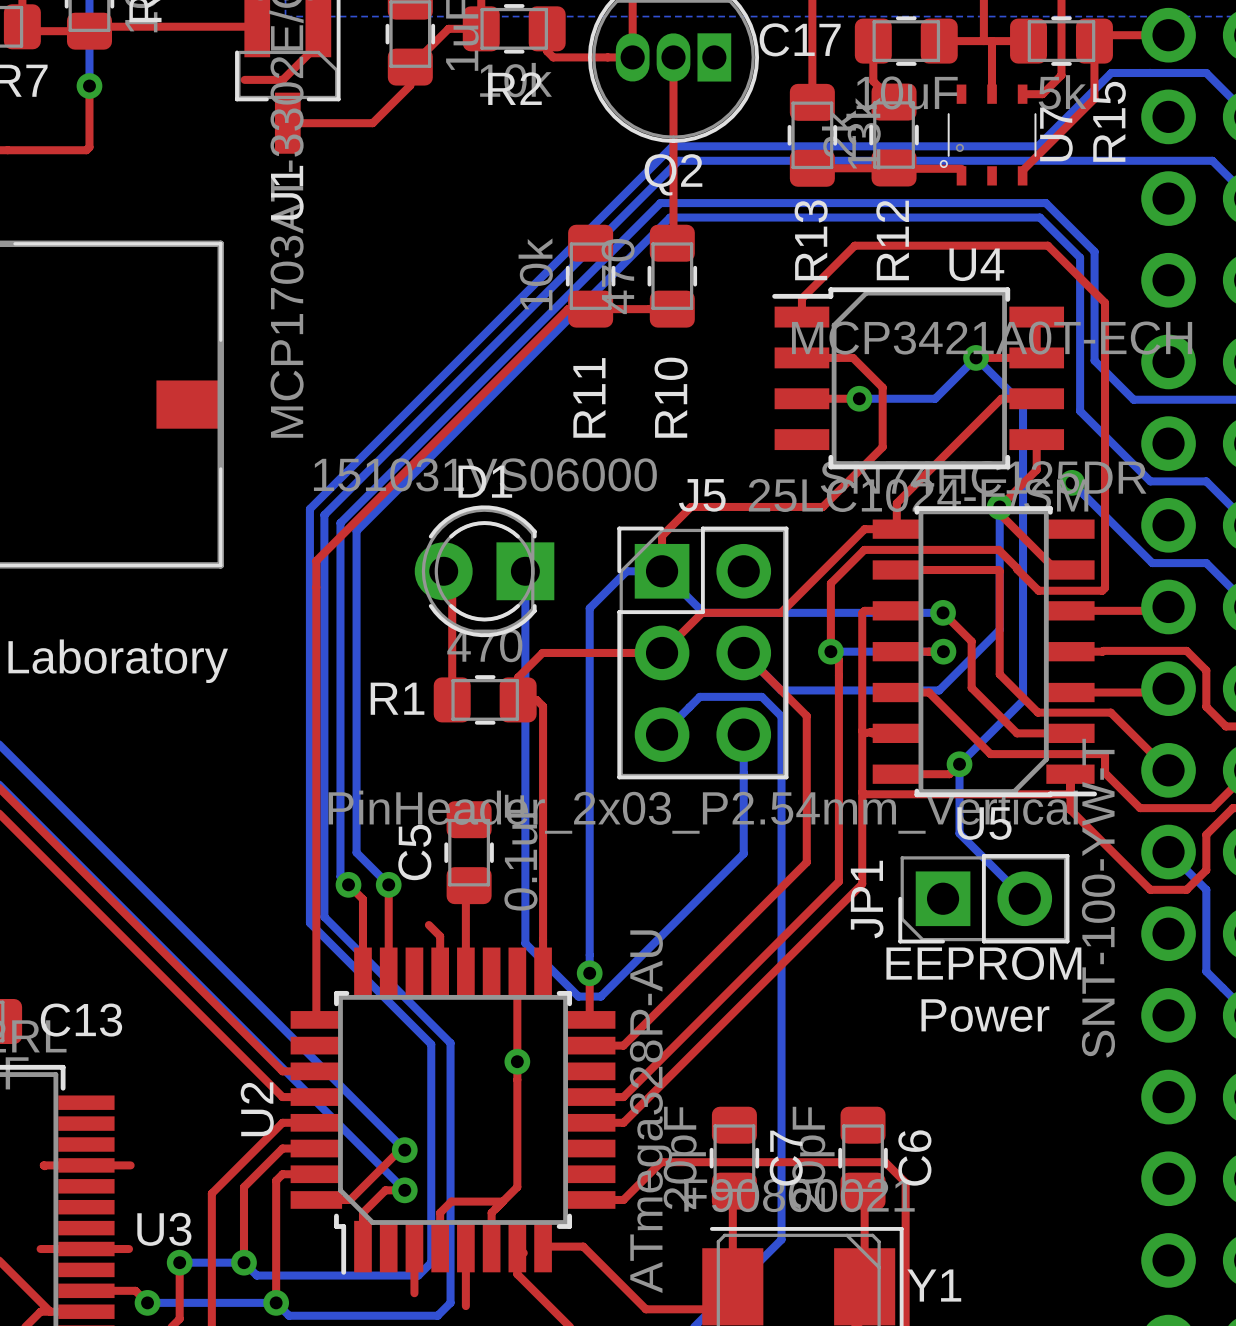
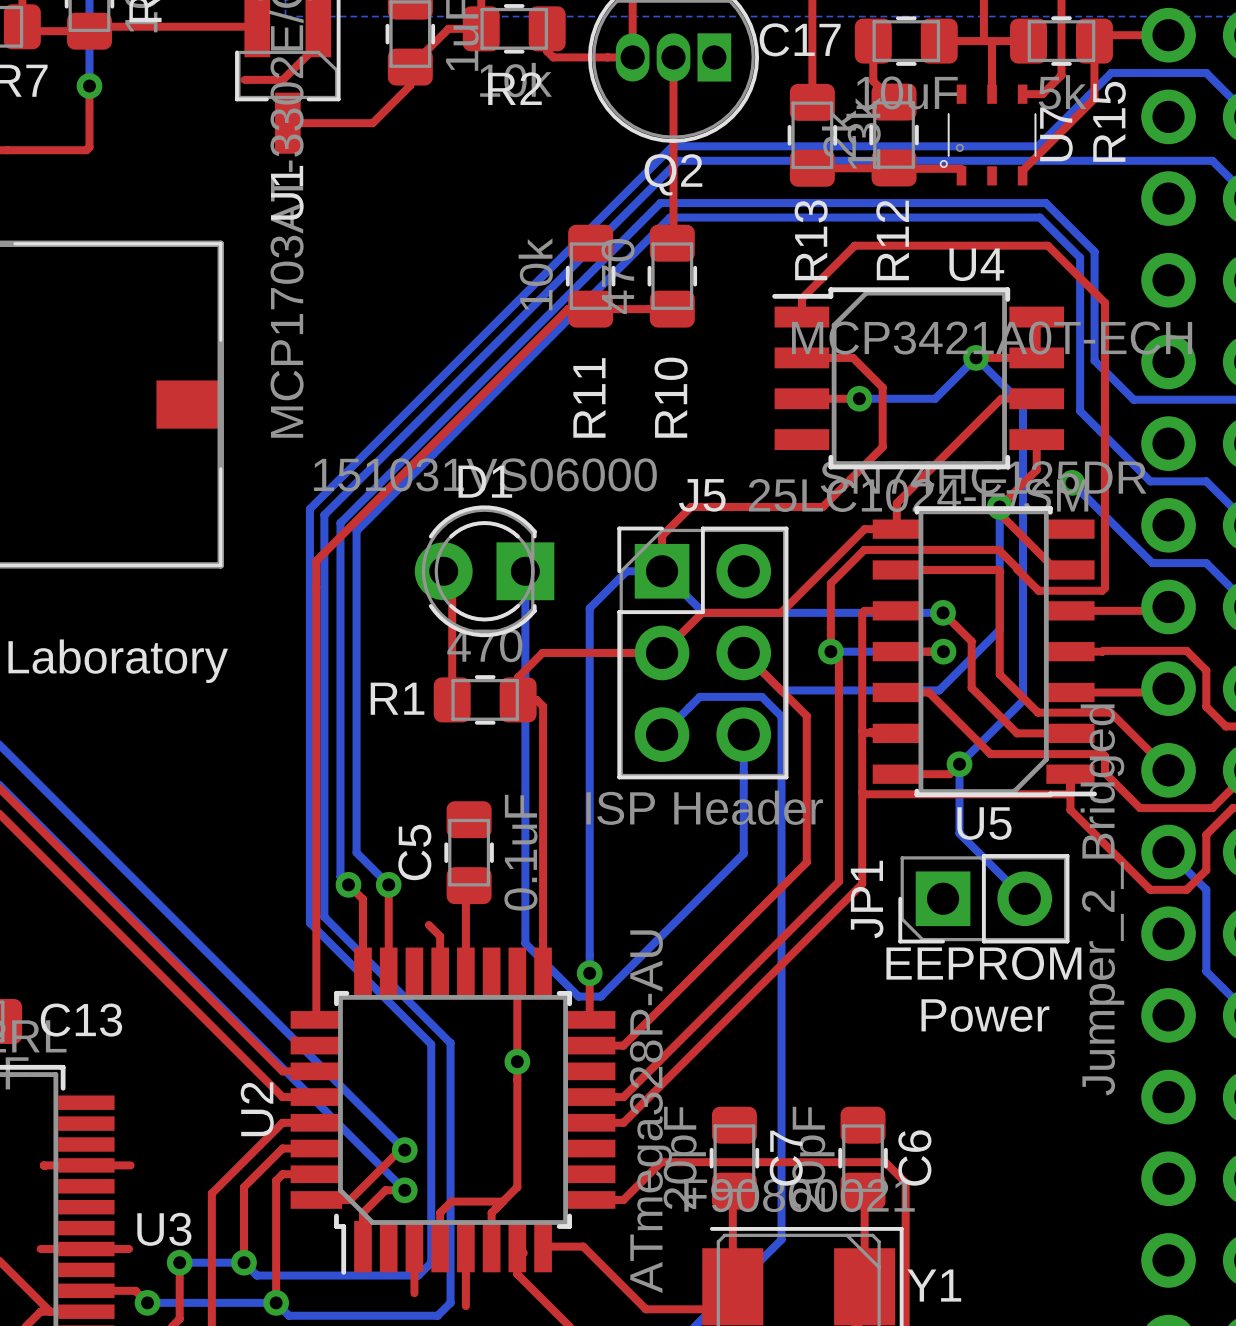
J5 value: PinHeader_2x03_P2.54mm_Vertical (703, 812) -> ISP Header (704, 807)
JP1 value: SNT-100-YW-T (1098, 898) -> Jumper_2_Bridged (1102, 899)

